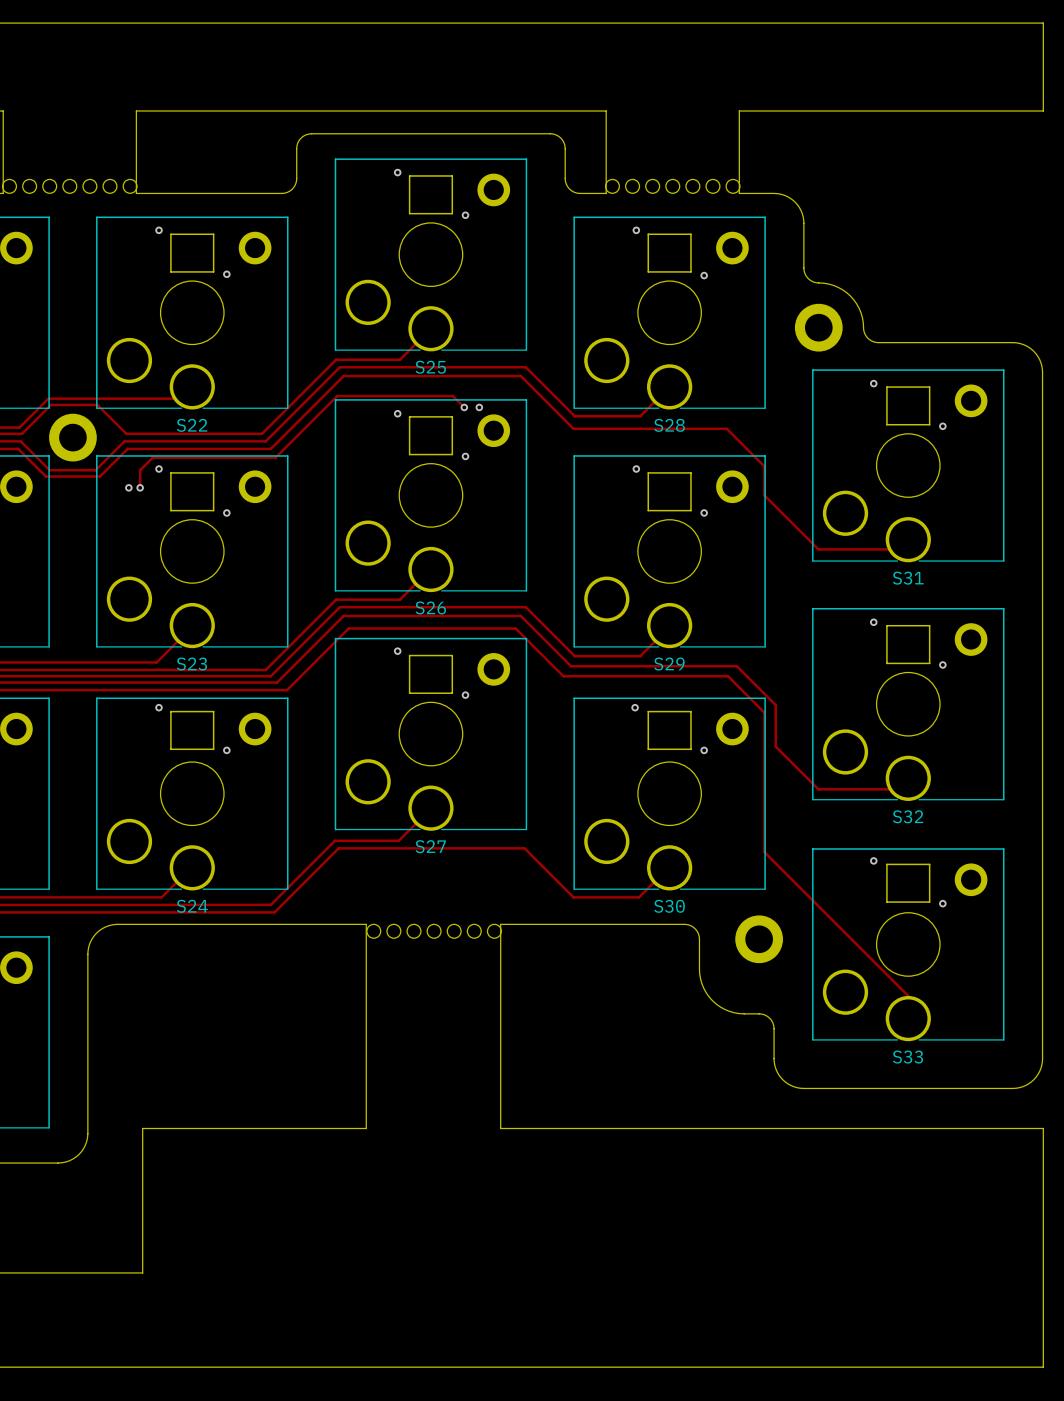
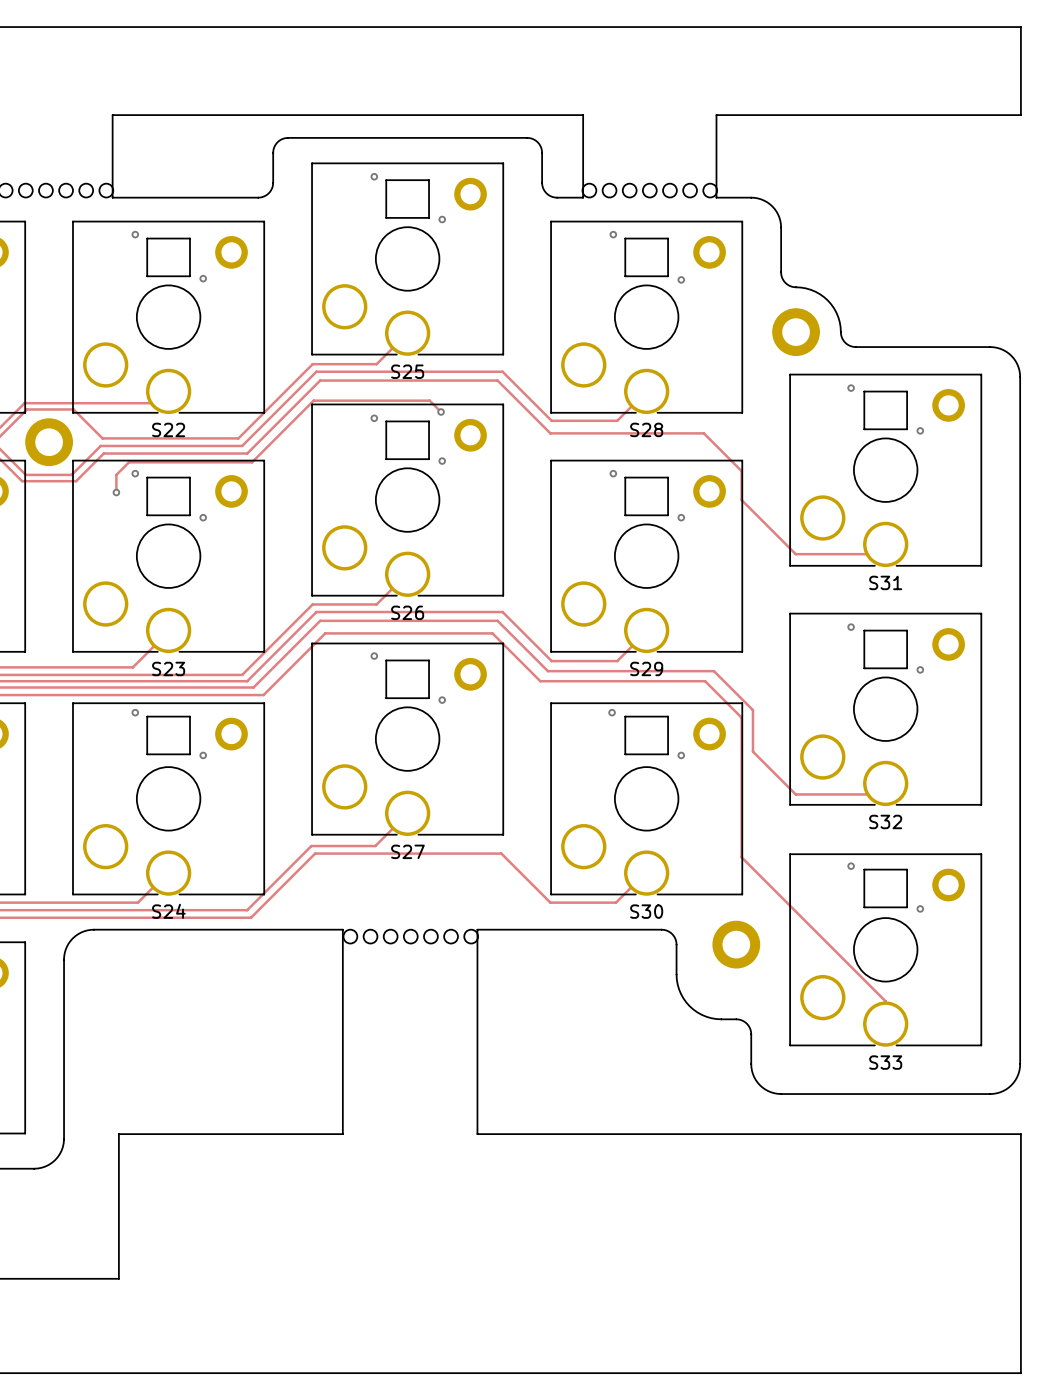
via: (479, 407) -> none
via: (128, 487) -> none

